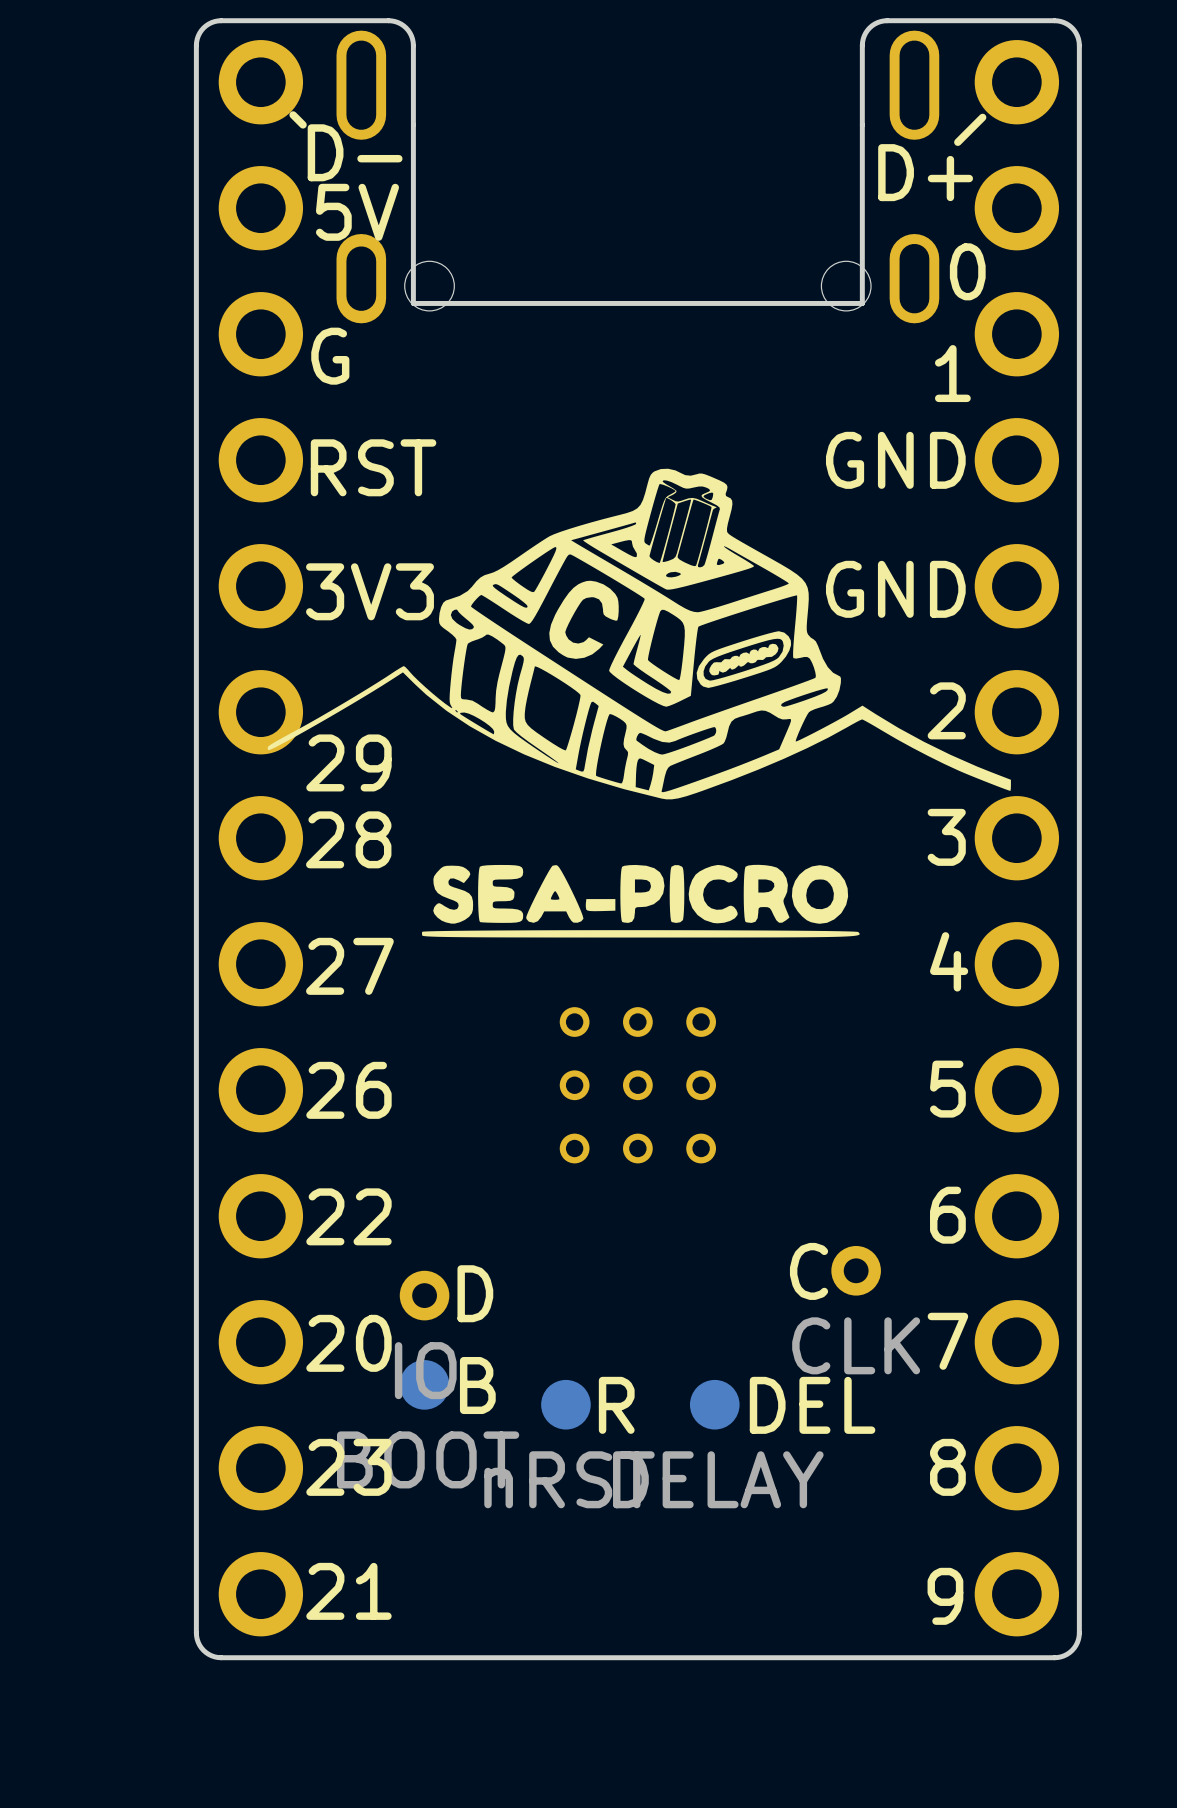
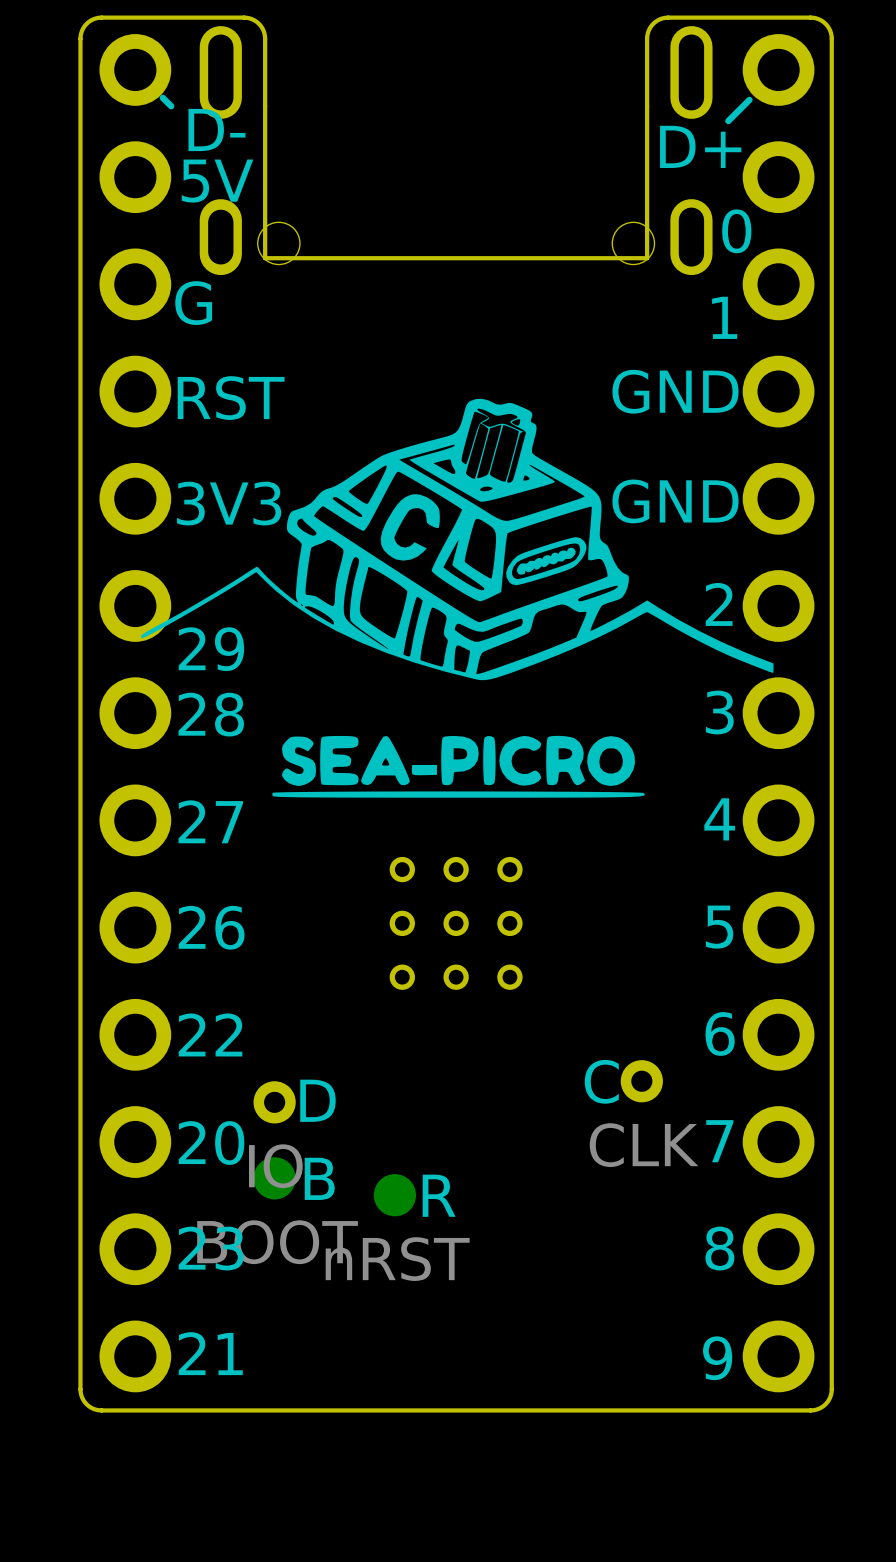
part: DELAY (714, 1404) -> none
text: DEL (812, 1405) -> none

